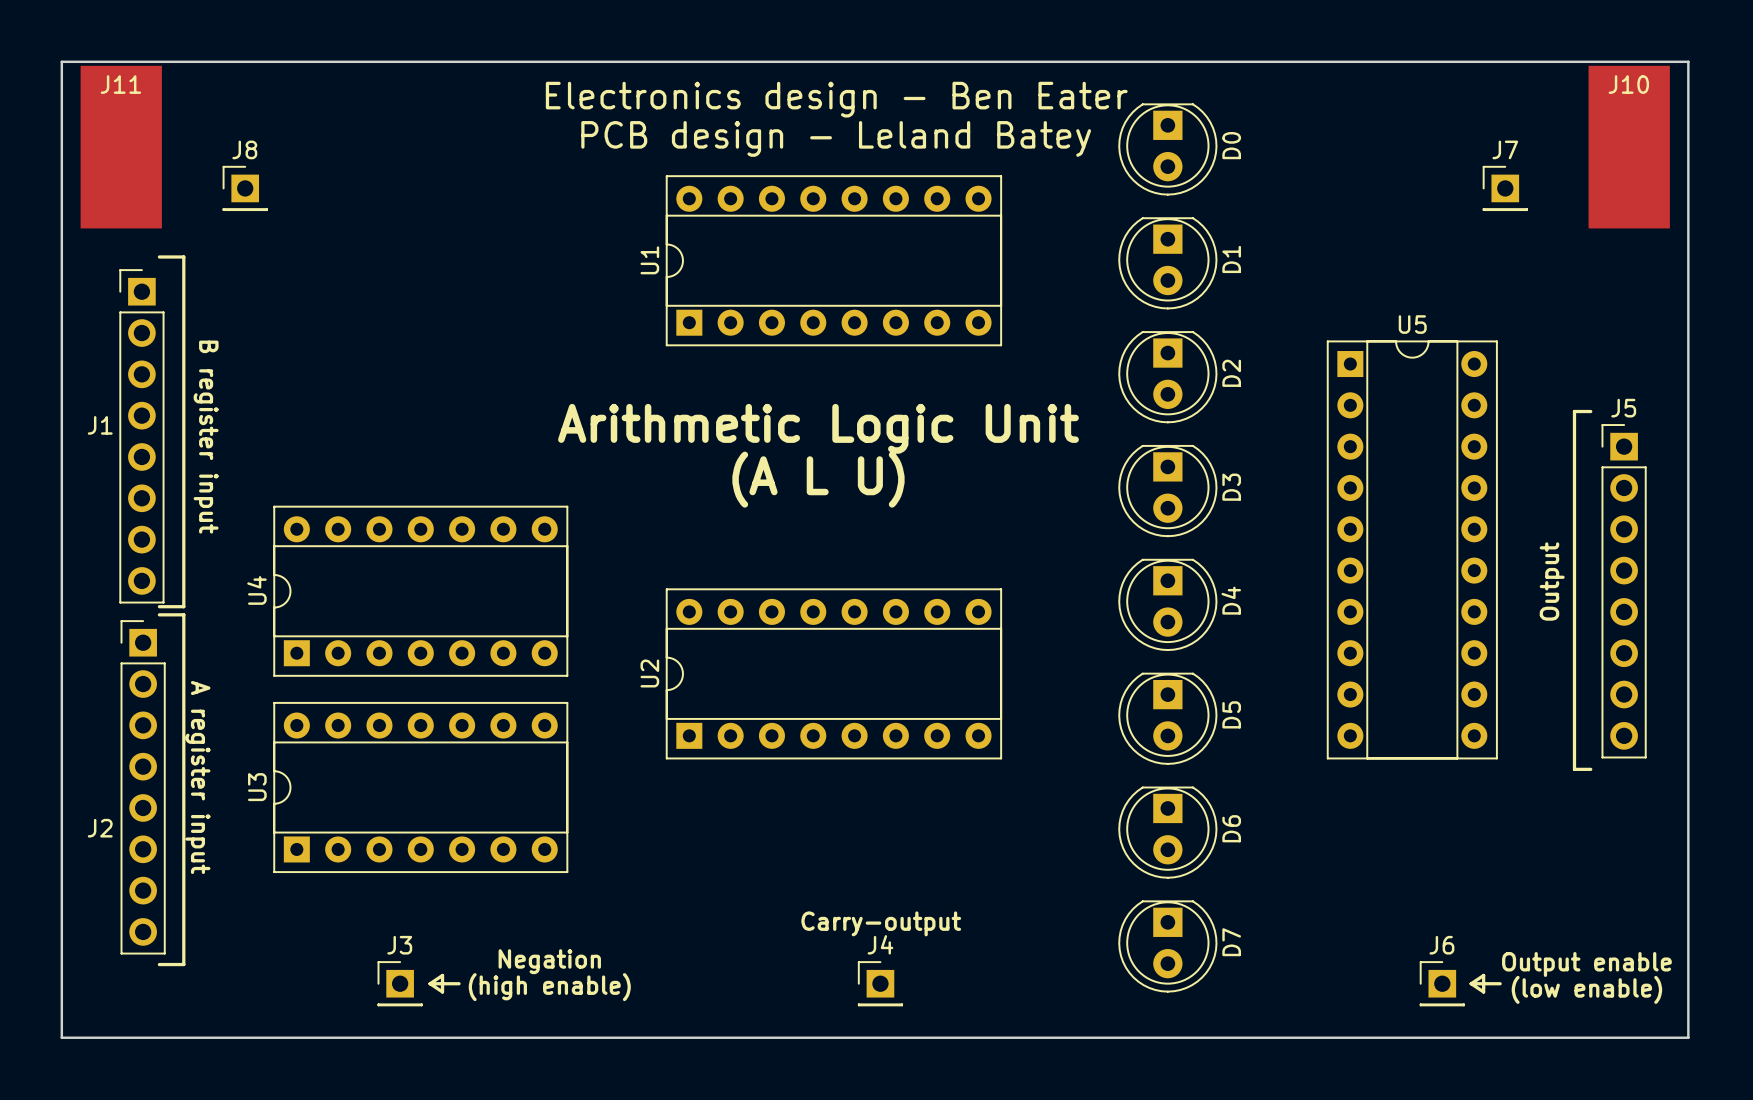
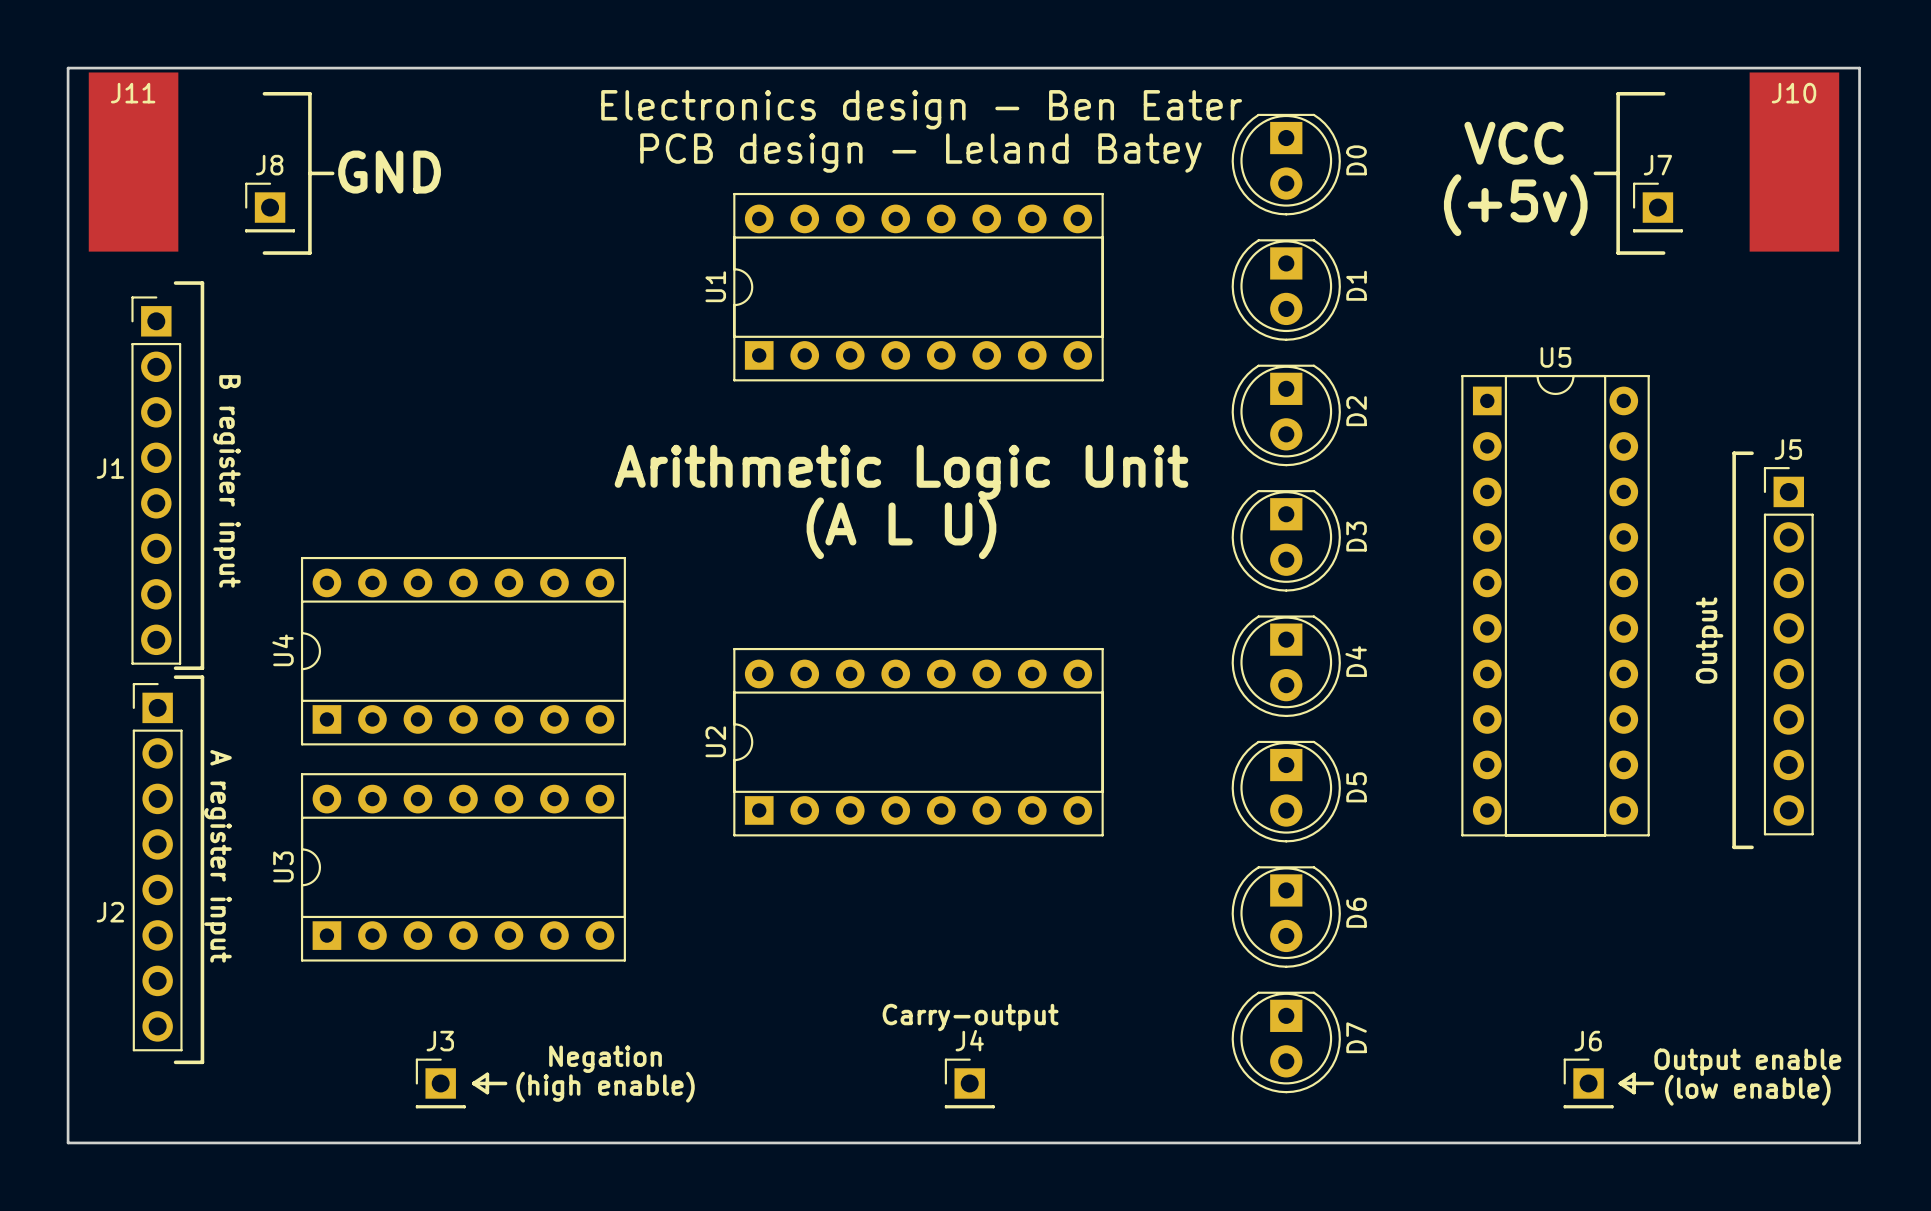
line: none -> (264, 93) (309, 93) (309, 253) (264, 253)
line: none -> (1663, 93) (1618, 93) (1618, 253) (1663, 253)
text: none -> VCC (1514, 143)
text: none -> GND (389, 172)
line: none -> (309, 173) (332, 173)
line: none -> (1595, 173) (1618, 173)
text: none -> (+5v) (1515, 205)

